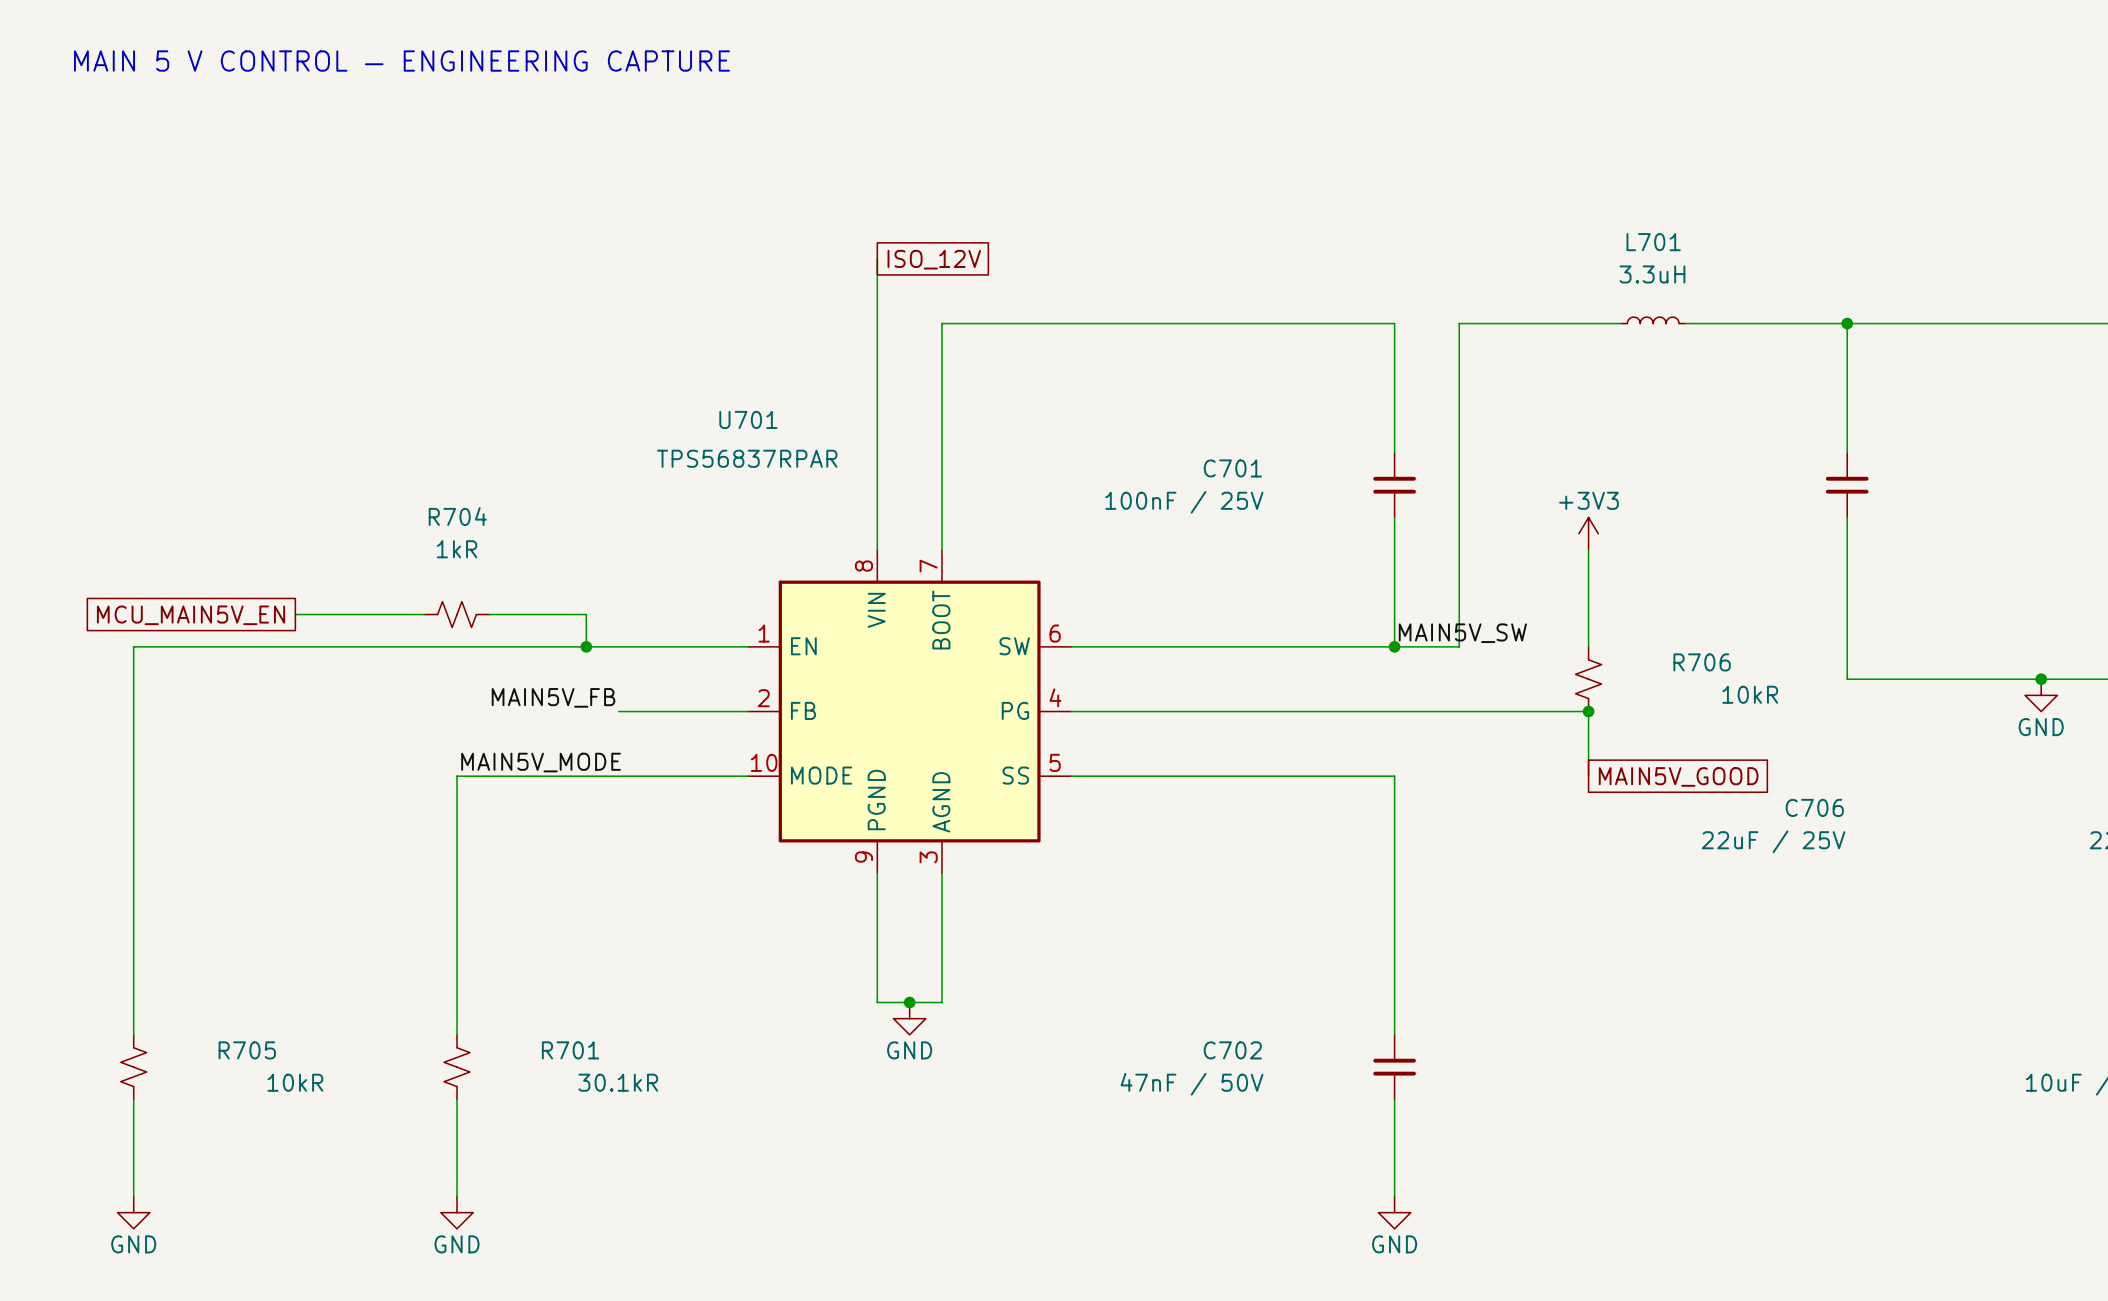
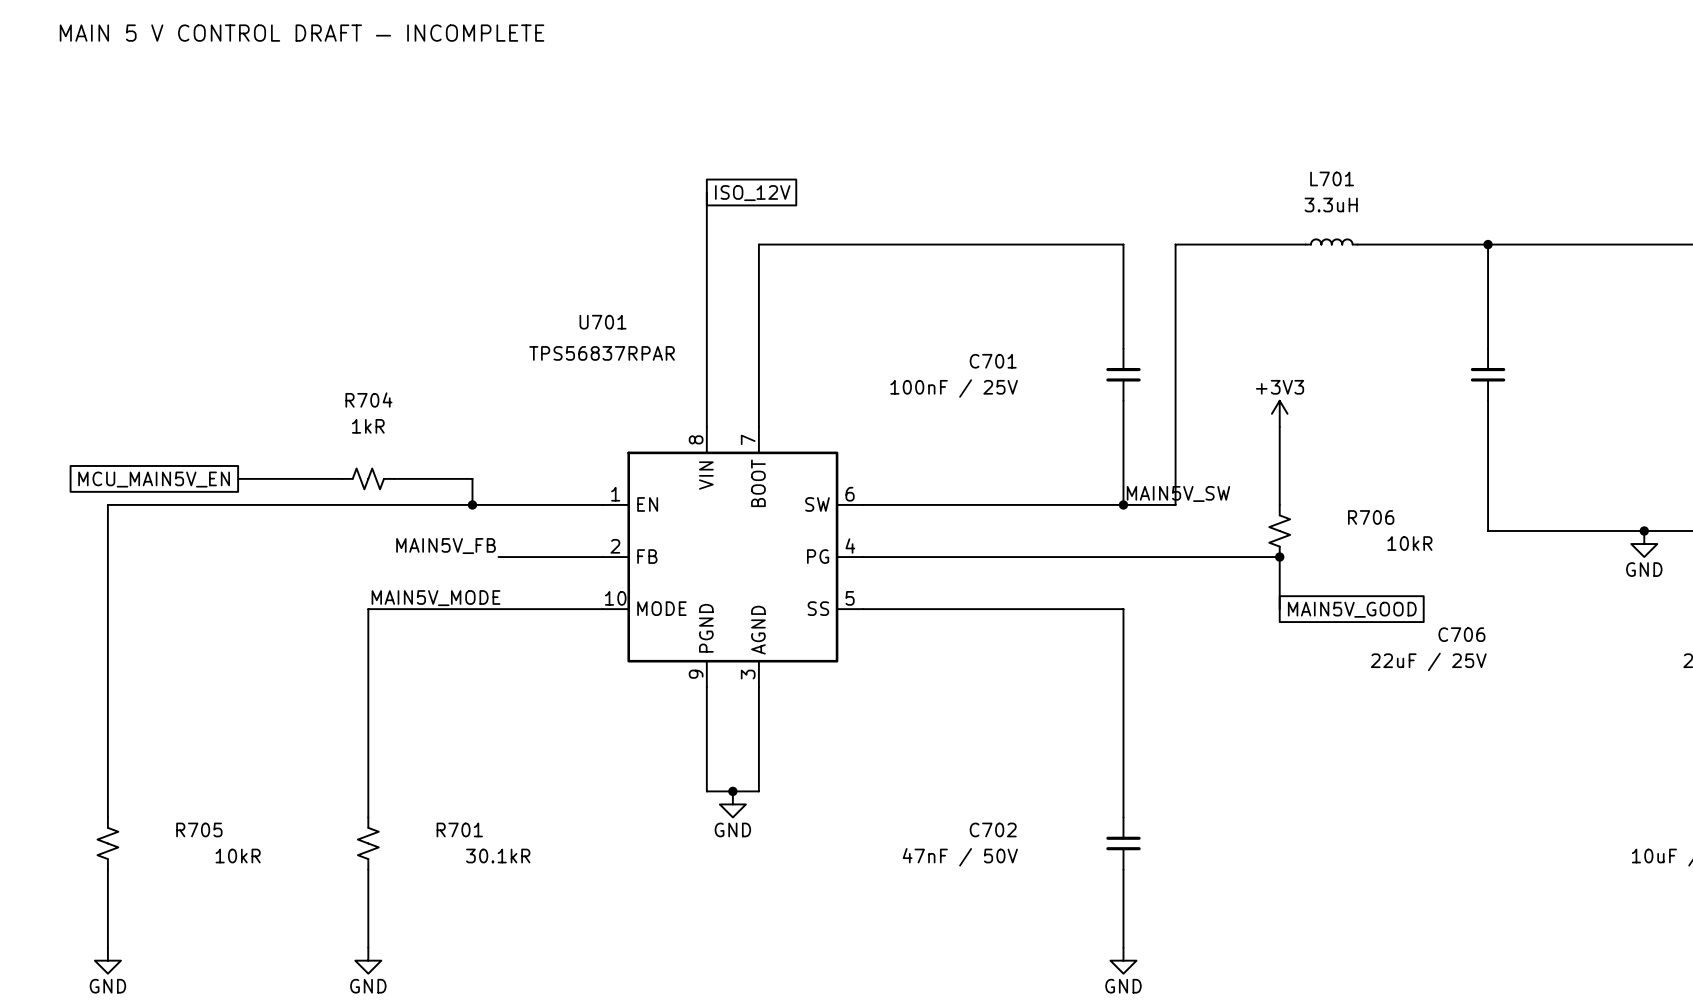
text: MAIN 5 V CONTROL — ENGINEERING CAPTURE (401, 61) -> MAIN 5 V CONTROL DRAFT — INCOMPLETE (302, 33)

